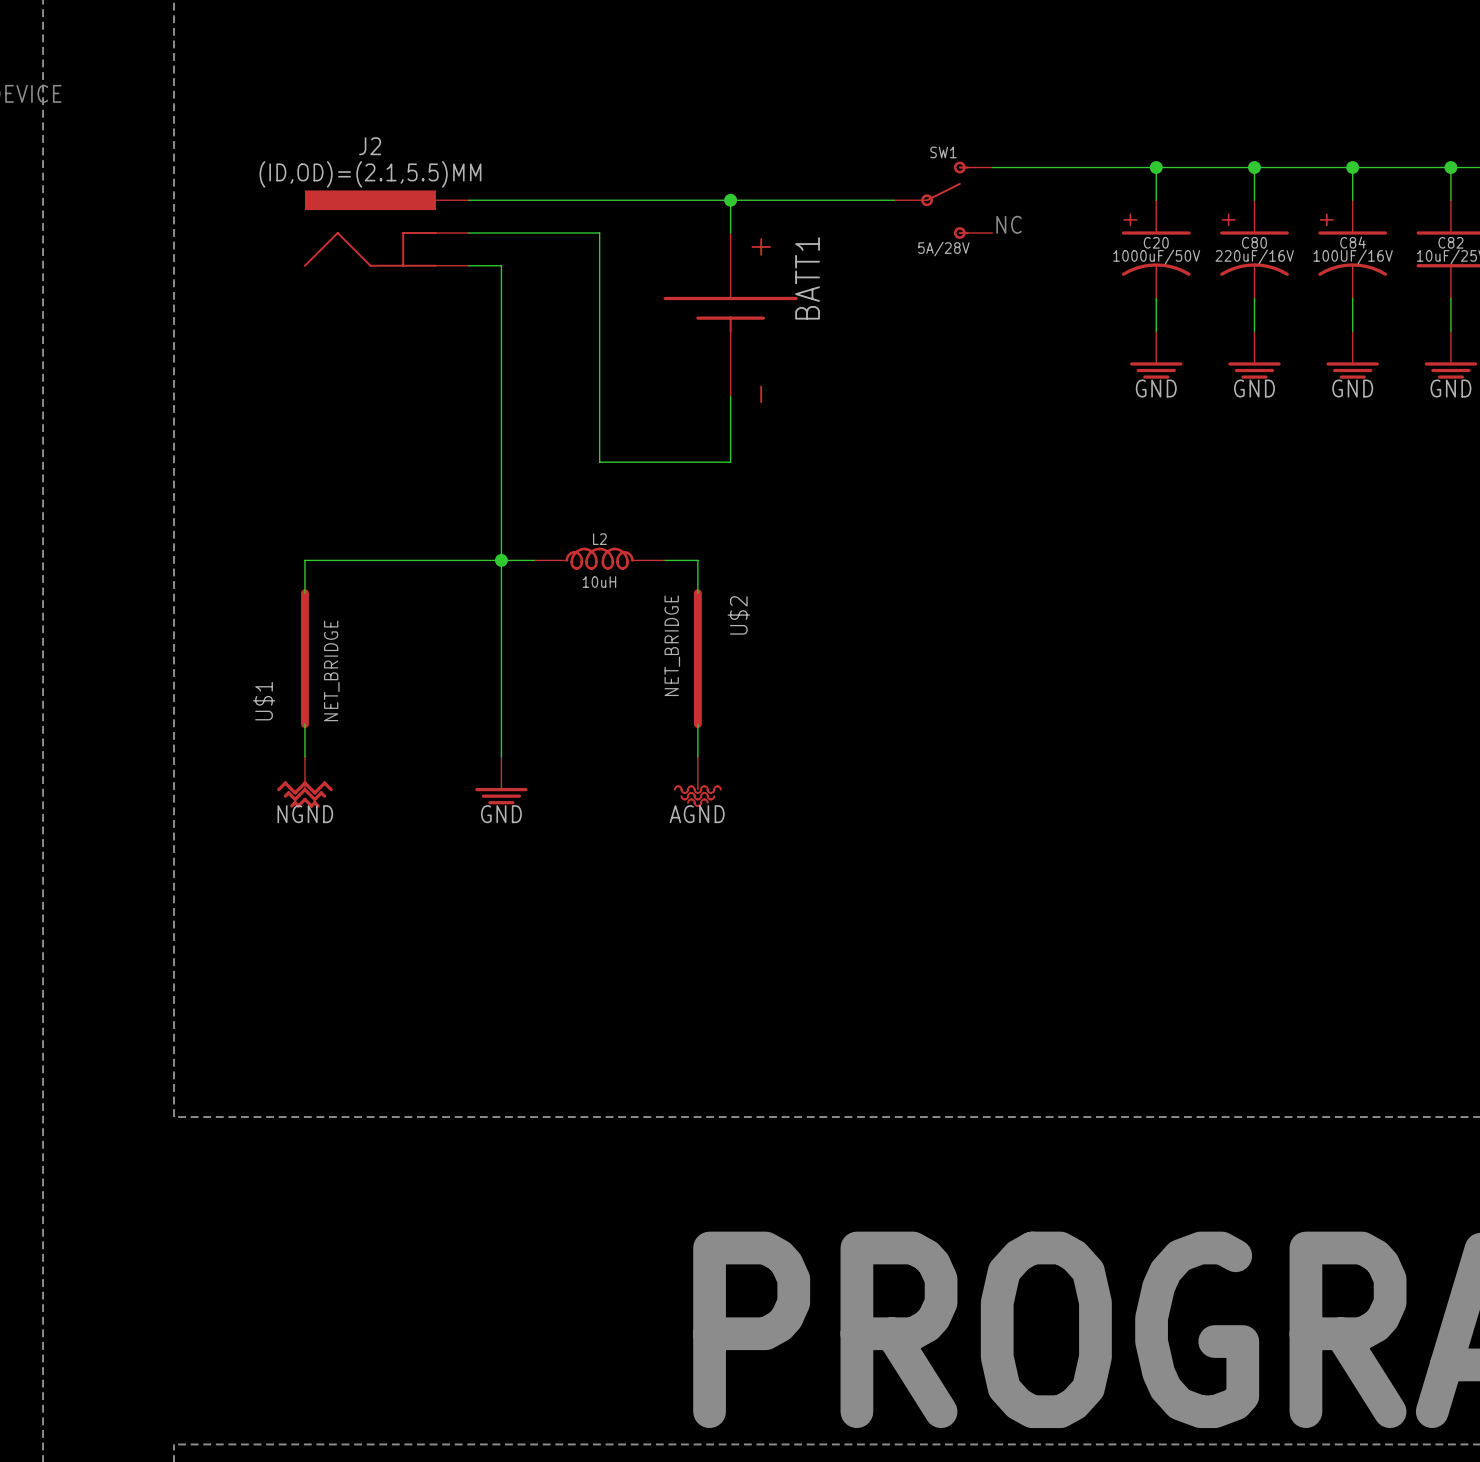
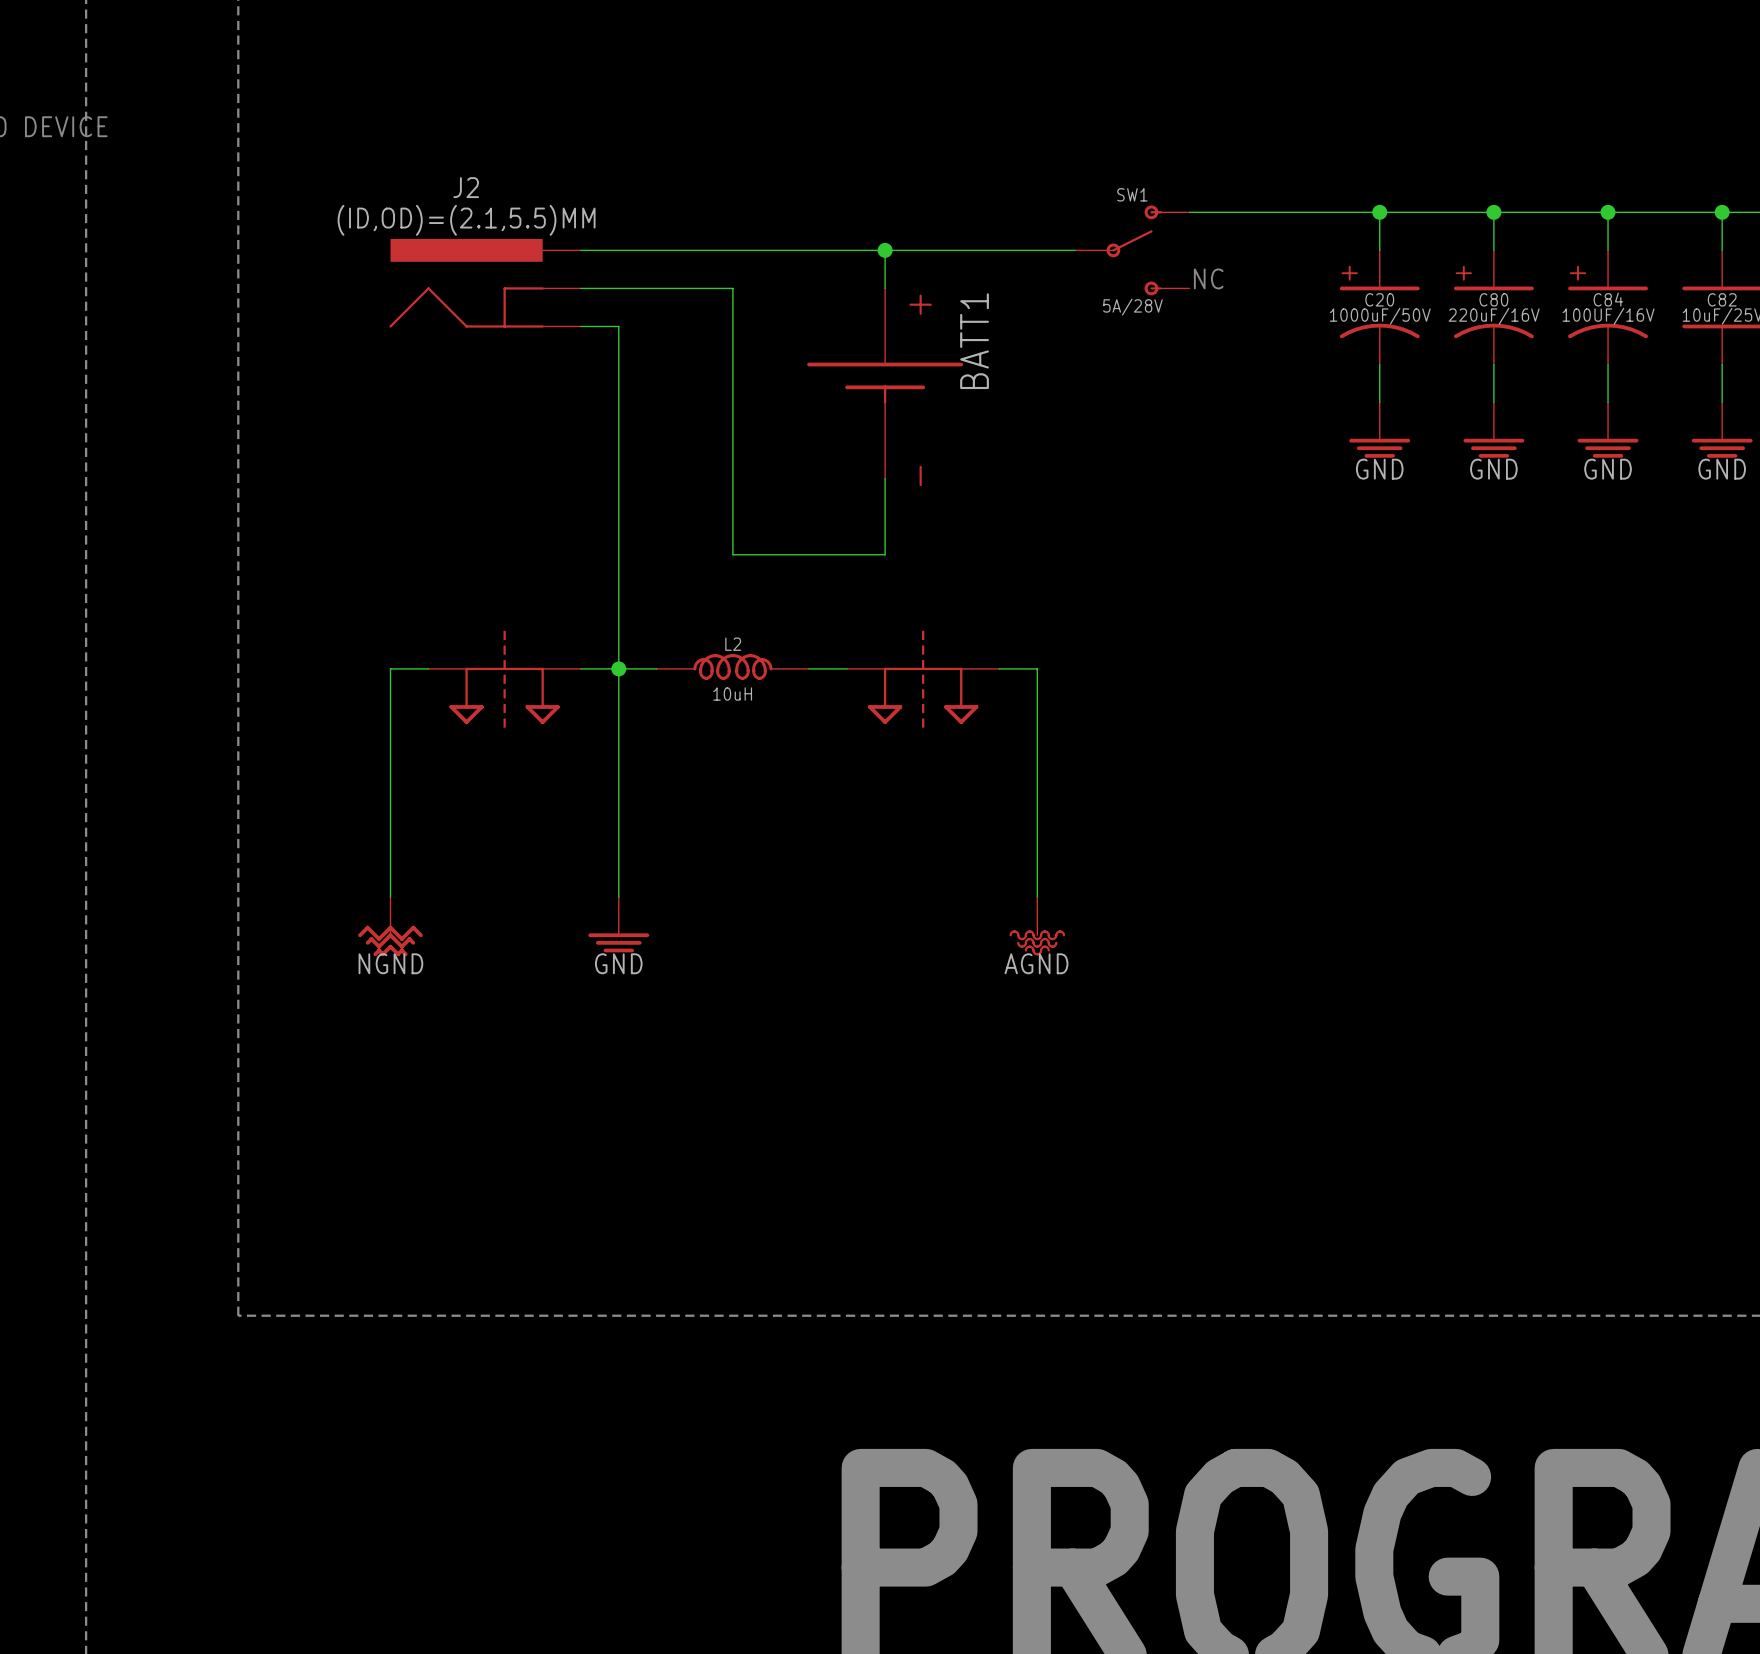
wire: (697, 560) (697, 593) -> none
wire: none -> (999, 668) (1037, 668) (1037, 897)
part: none -> (504, 680)
part: none -> (923, 680)
U$1: NET_BRIDGE (304, 658) -> none
U$2: NET_BRIDGE (697, 658) -> none
wire: (697, 724) (697, 756) -> none
power symbol position: (697, 781) -> (1037, 926)

